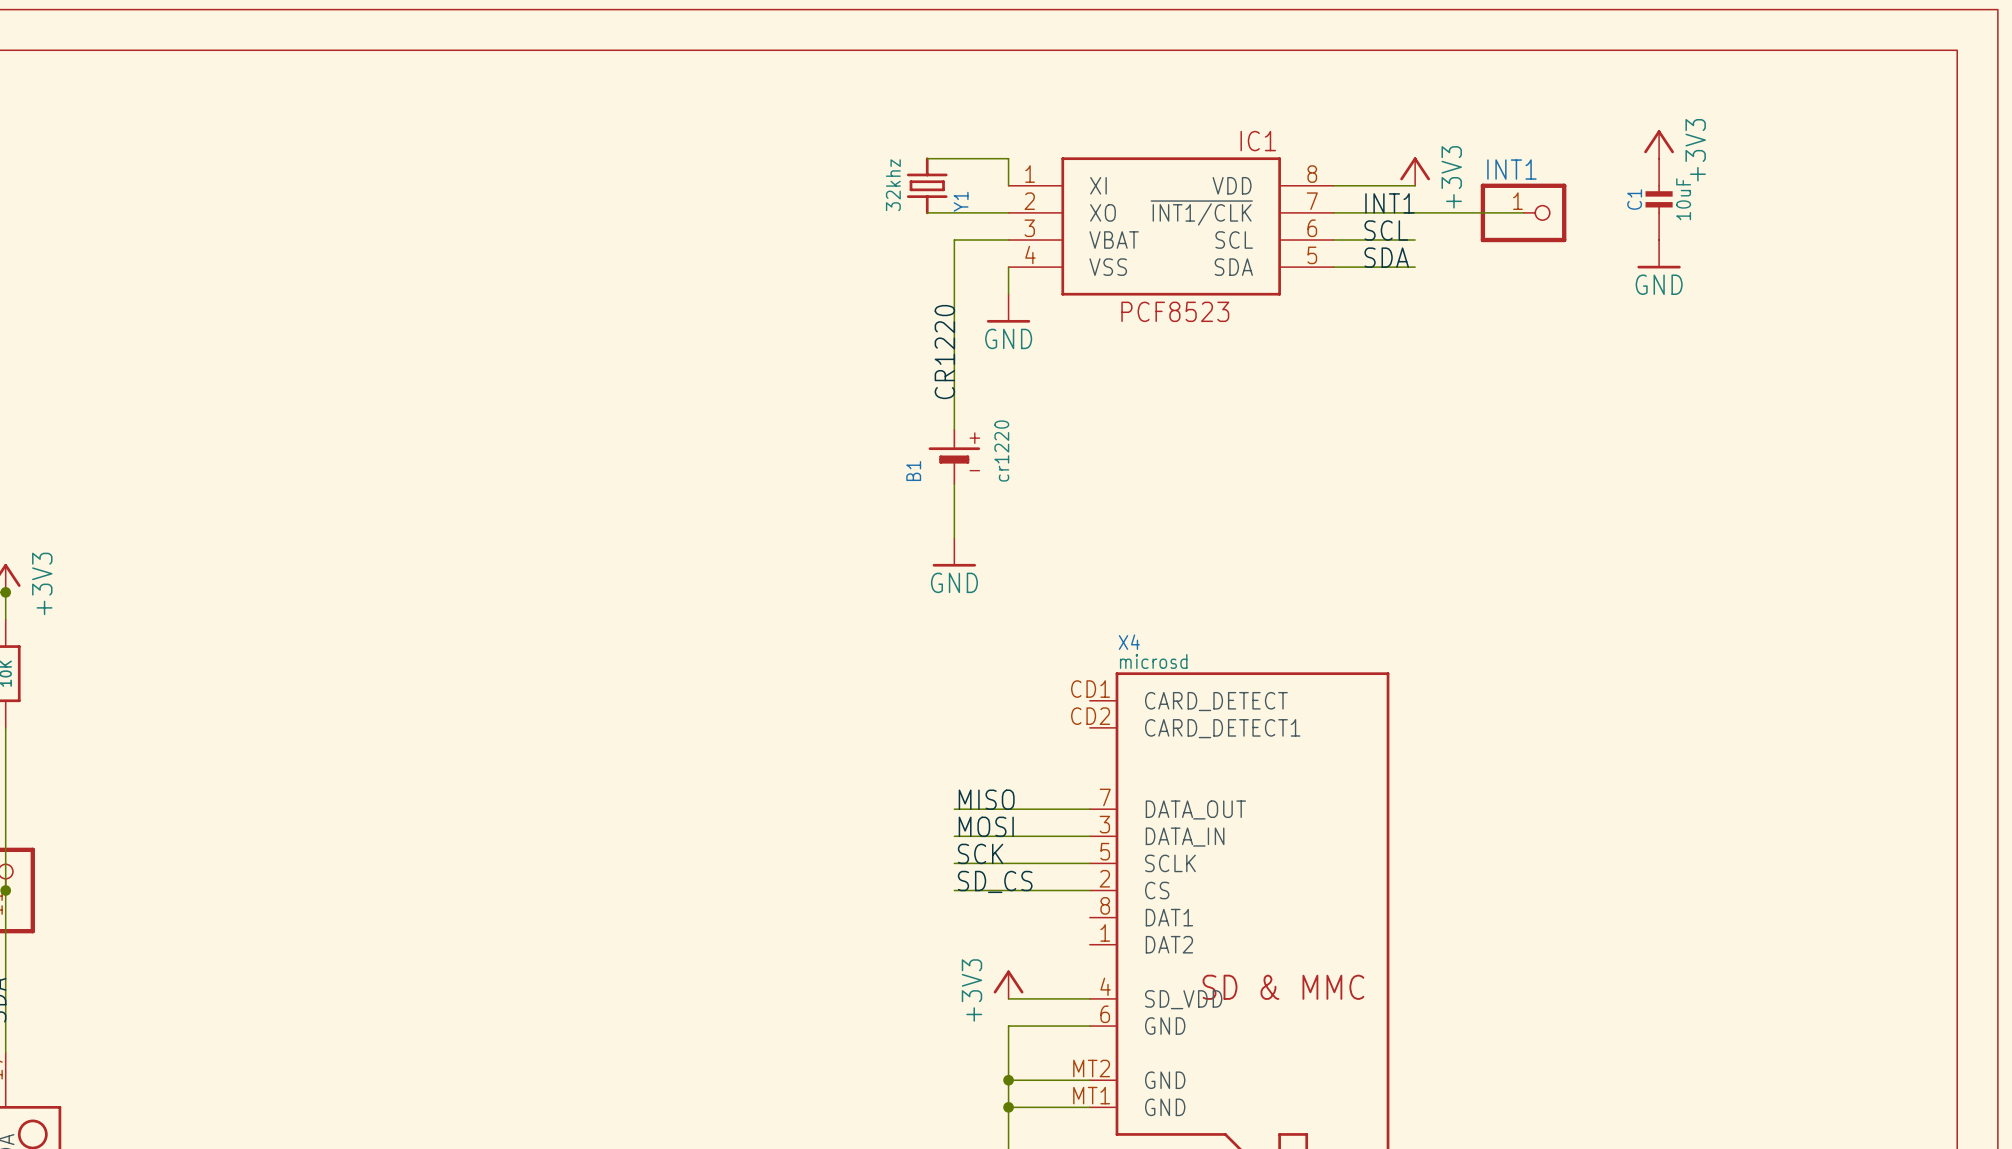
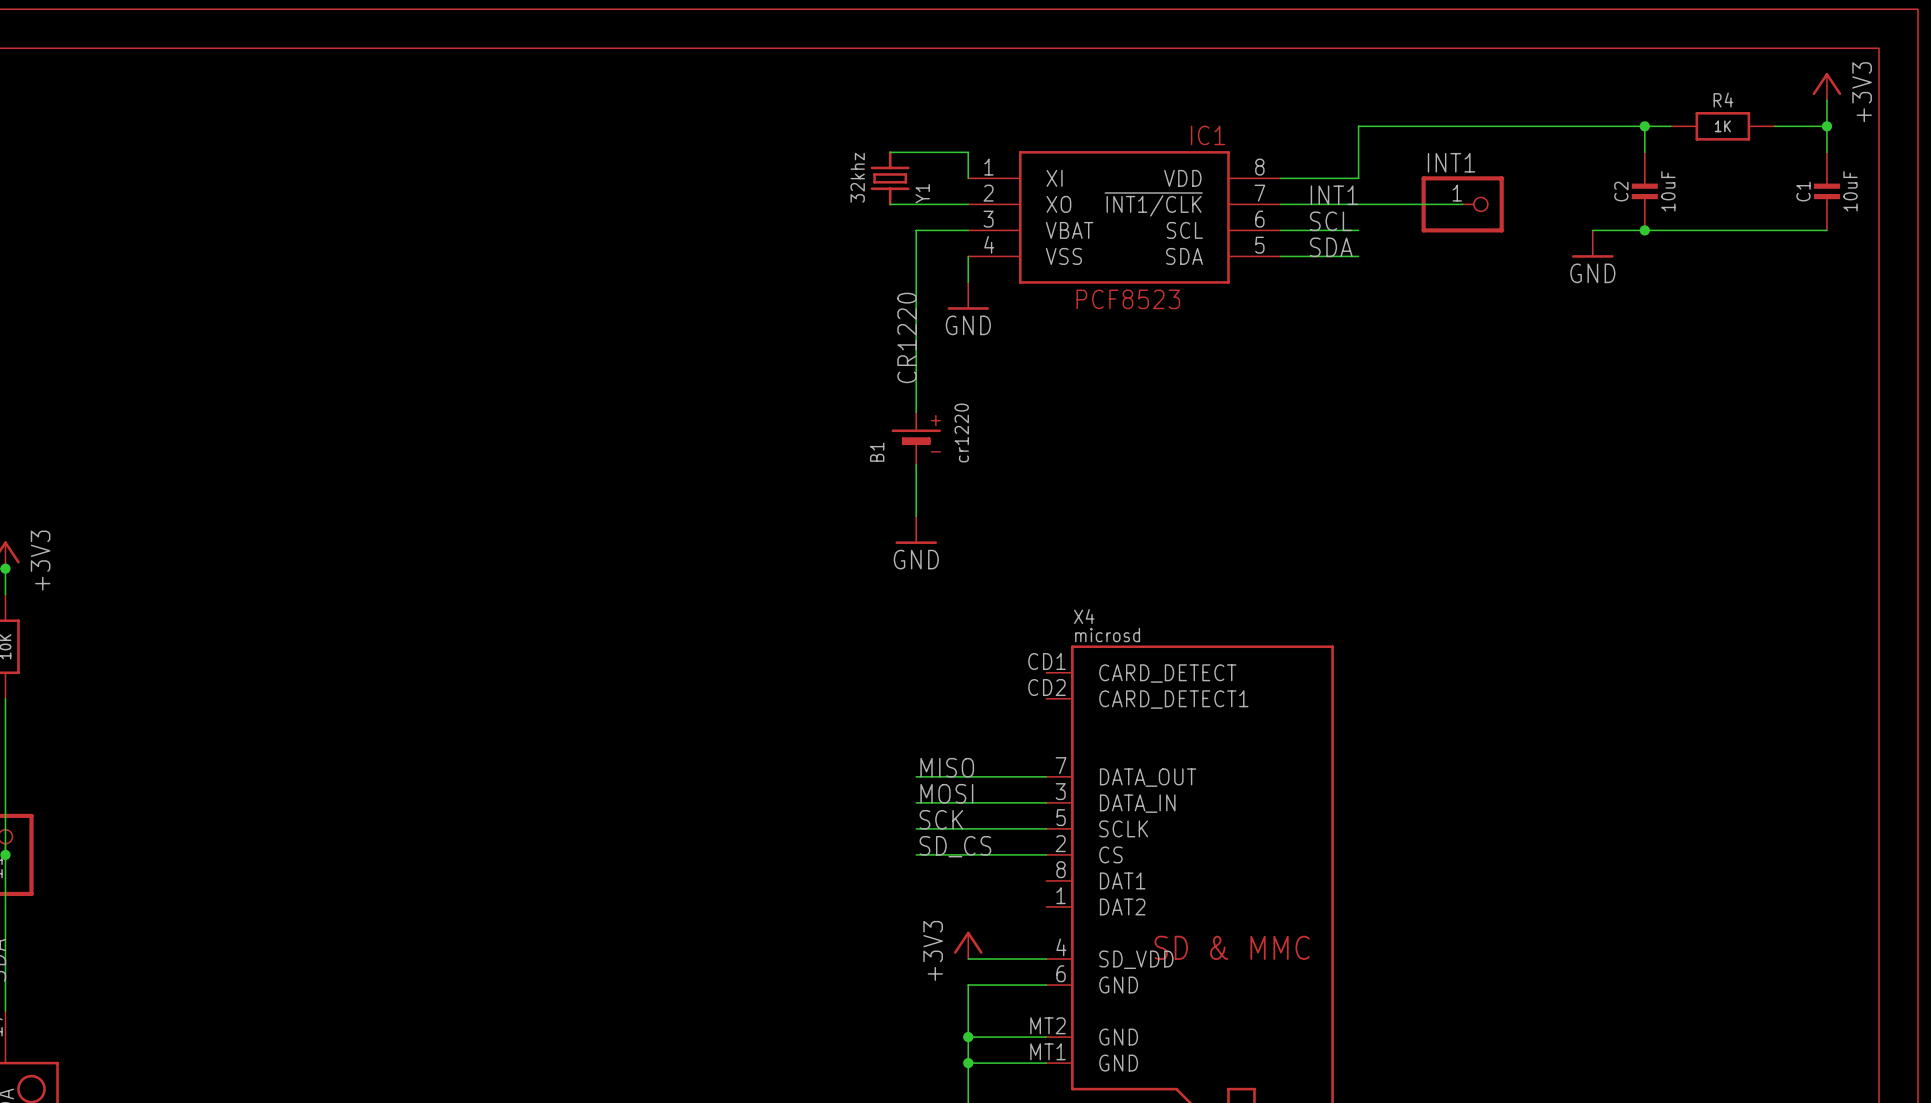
power symbol: none -> +3V3 (1826, 86)
wire: none -> (1826, 100) (1826, 152)
wire: none -> (1644, 126) (1644, 152)
junction: none -> (1644, 126)
wire: none -> (1670, 126) (1358, 126) (1358, 178)
R4: none -> 1K (1722, 126)
wire: none -> (1774, 126) (1826, 126)
junction: none -> (1826, 126)
power symbol: +3V3 (1659, 144) -> none
power symbol: +3V3 (1415, 171) -> none
C1 position: (1659, 199) -> (1826, 191)
C2: none -> 10uF (1644, 191)
wire: none -> (1592, 230) (1826, 230)
junction: none -> (1644, 230)

